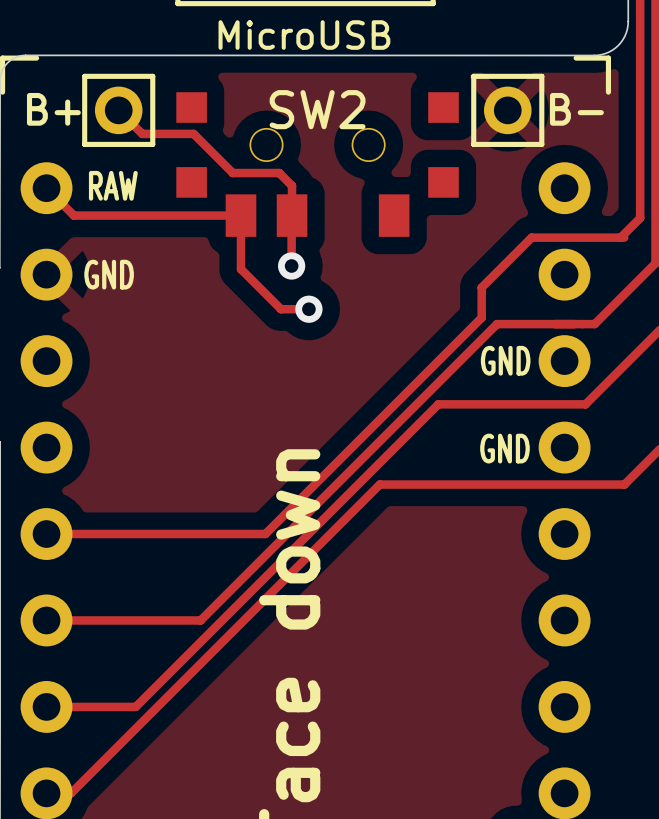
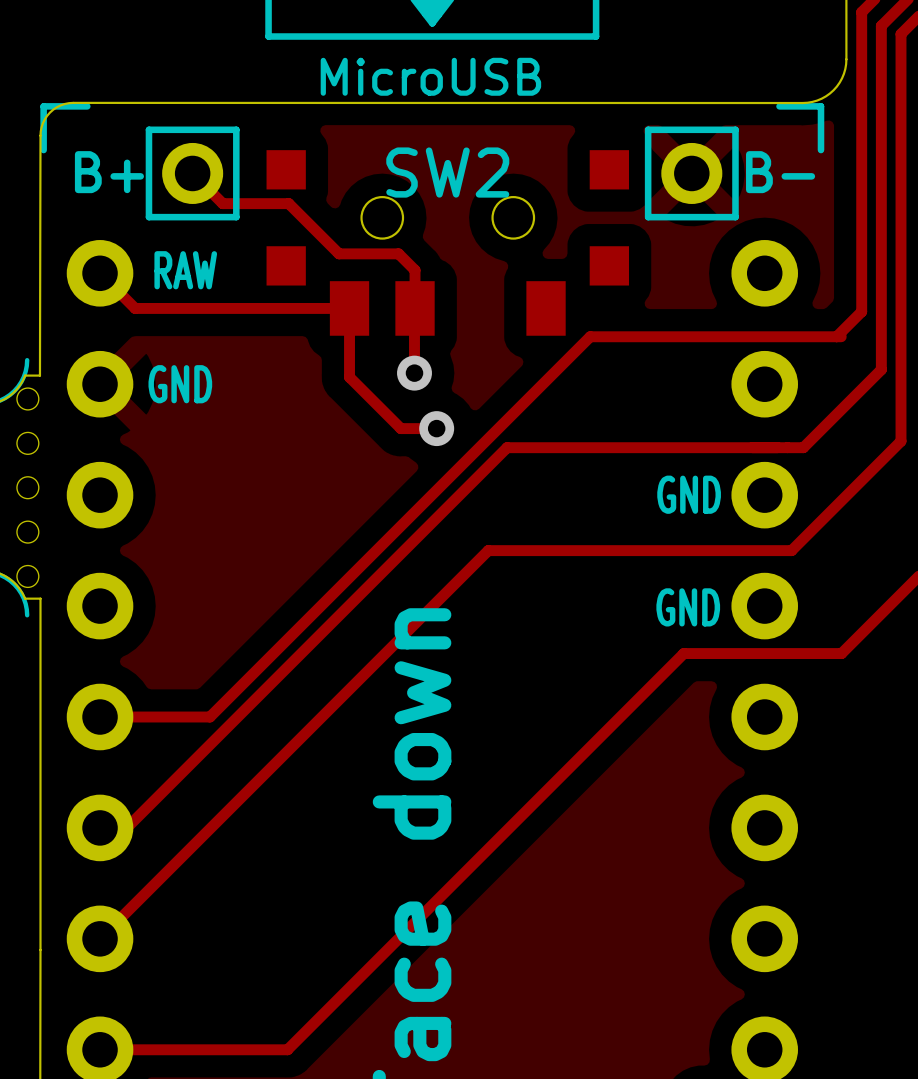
track: (531, 237) (481, 287) (481, 317) (265, 534) (132, 534) -> (722, 336) (590, 336) (209, 717)
track: (496, 324) (200, 620) (67, 620) -> (677, 447) (507, 447) (126, 827)
track: (438, 404) (135, 706) (46, 706) -> (602, 550) (488, 550) (100, 938)
track: (501, 484) (379, 484) (70, 793) -> (683, 653) (287, 1049) (131, 1049)

